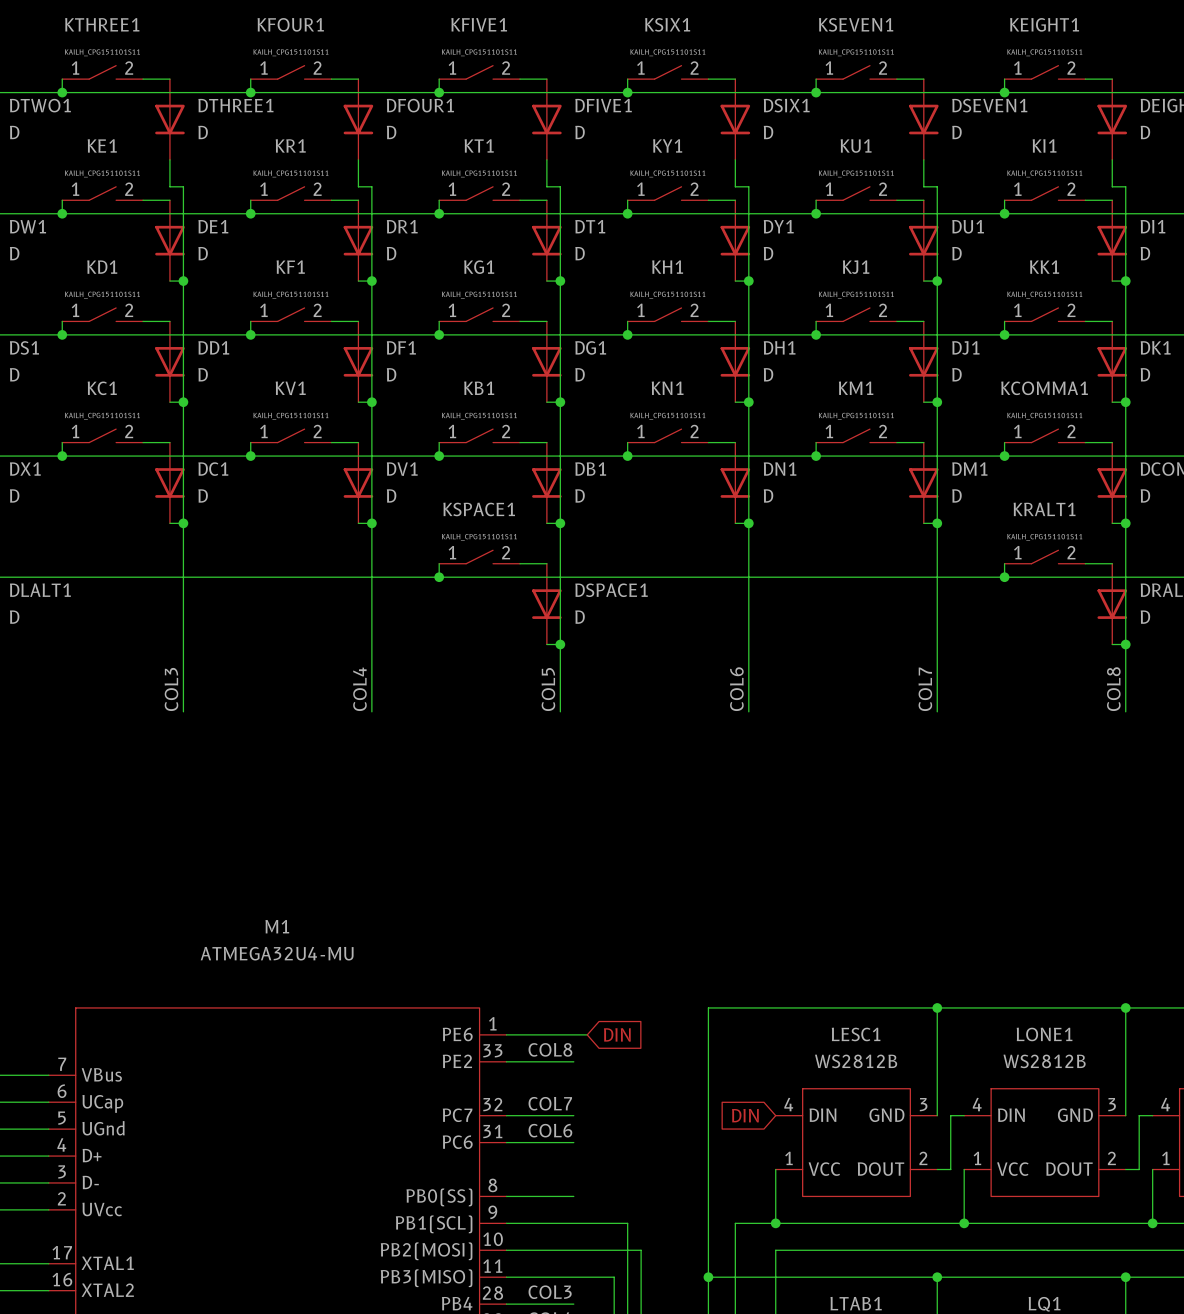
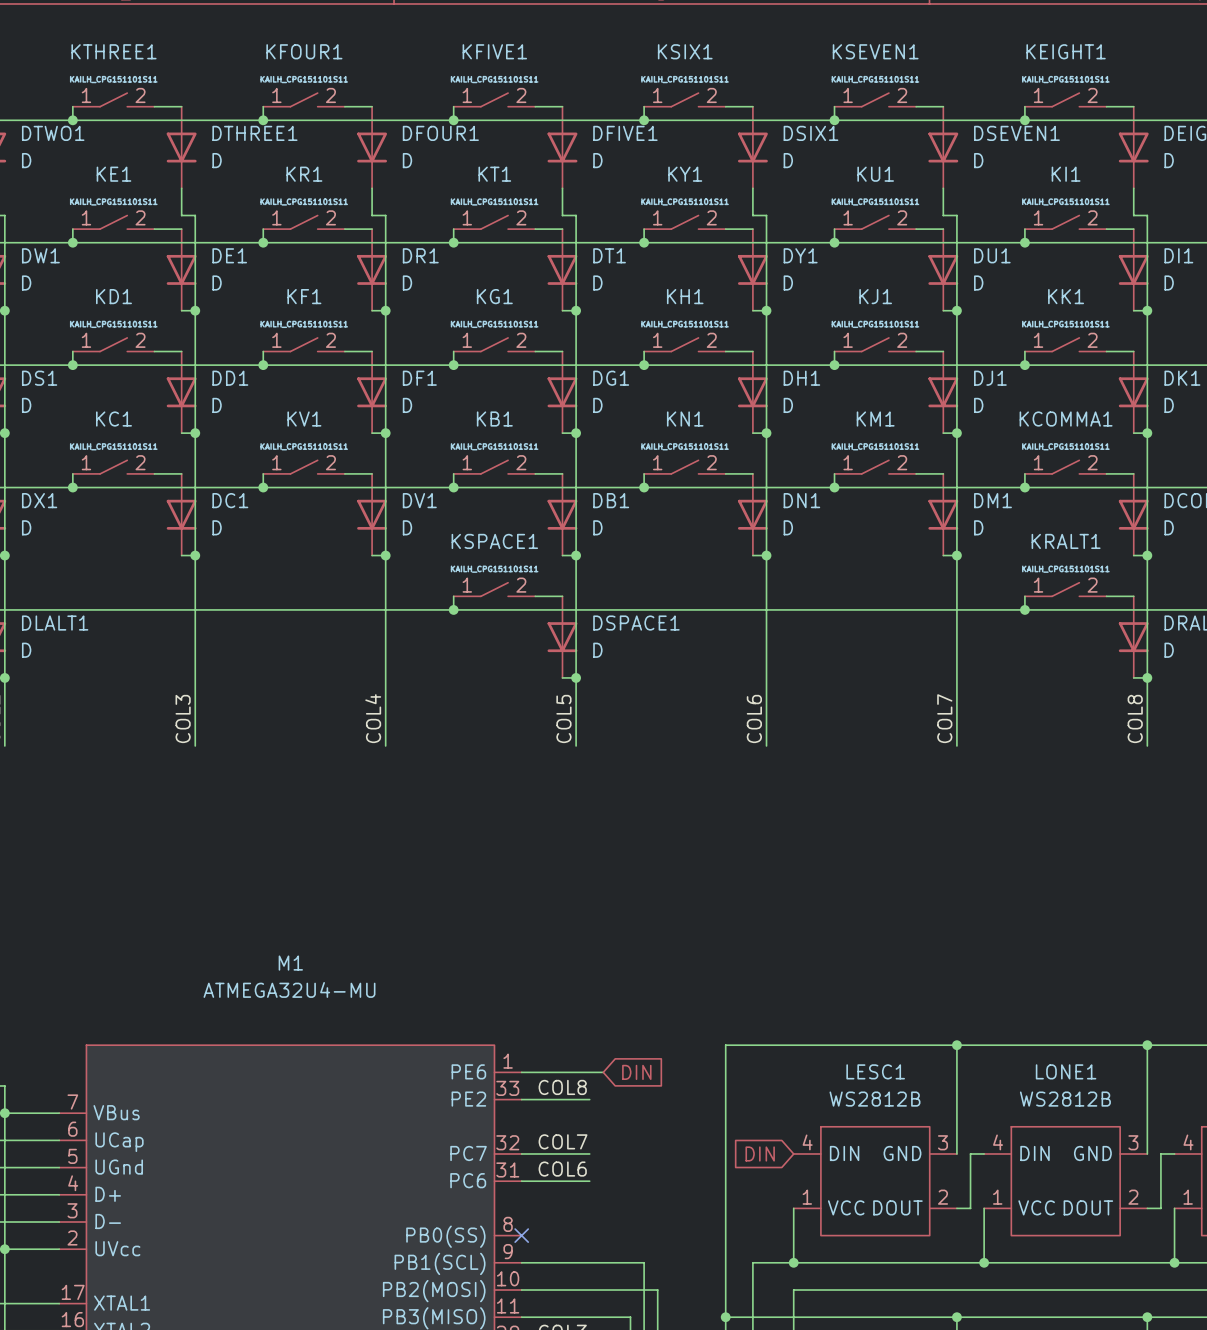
wire: (506, 1196) (573, 1196) -> none
no-connect mark: none -> (521, 1235)

